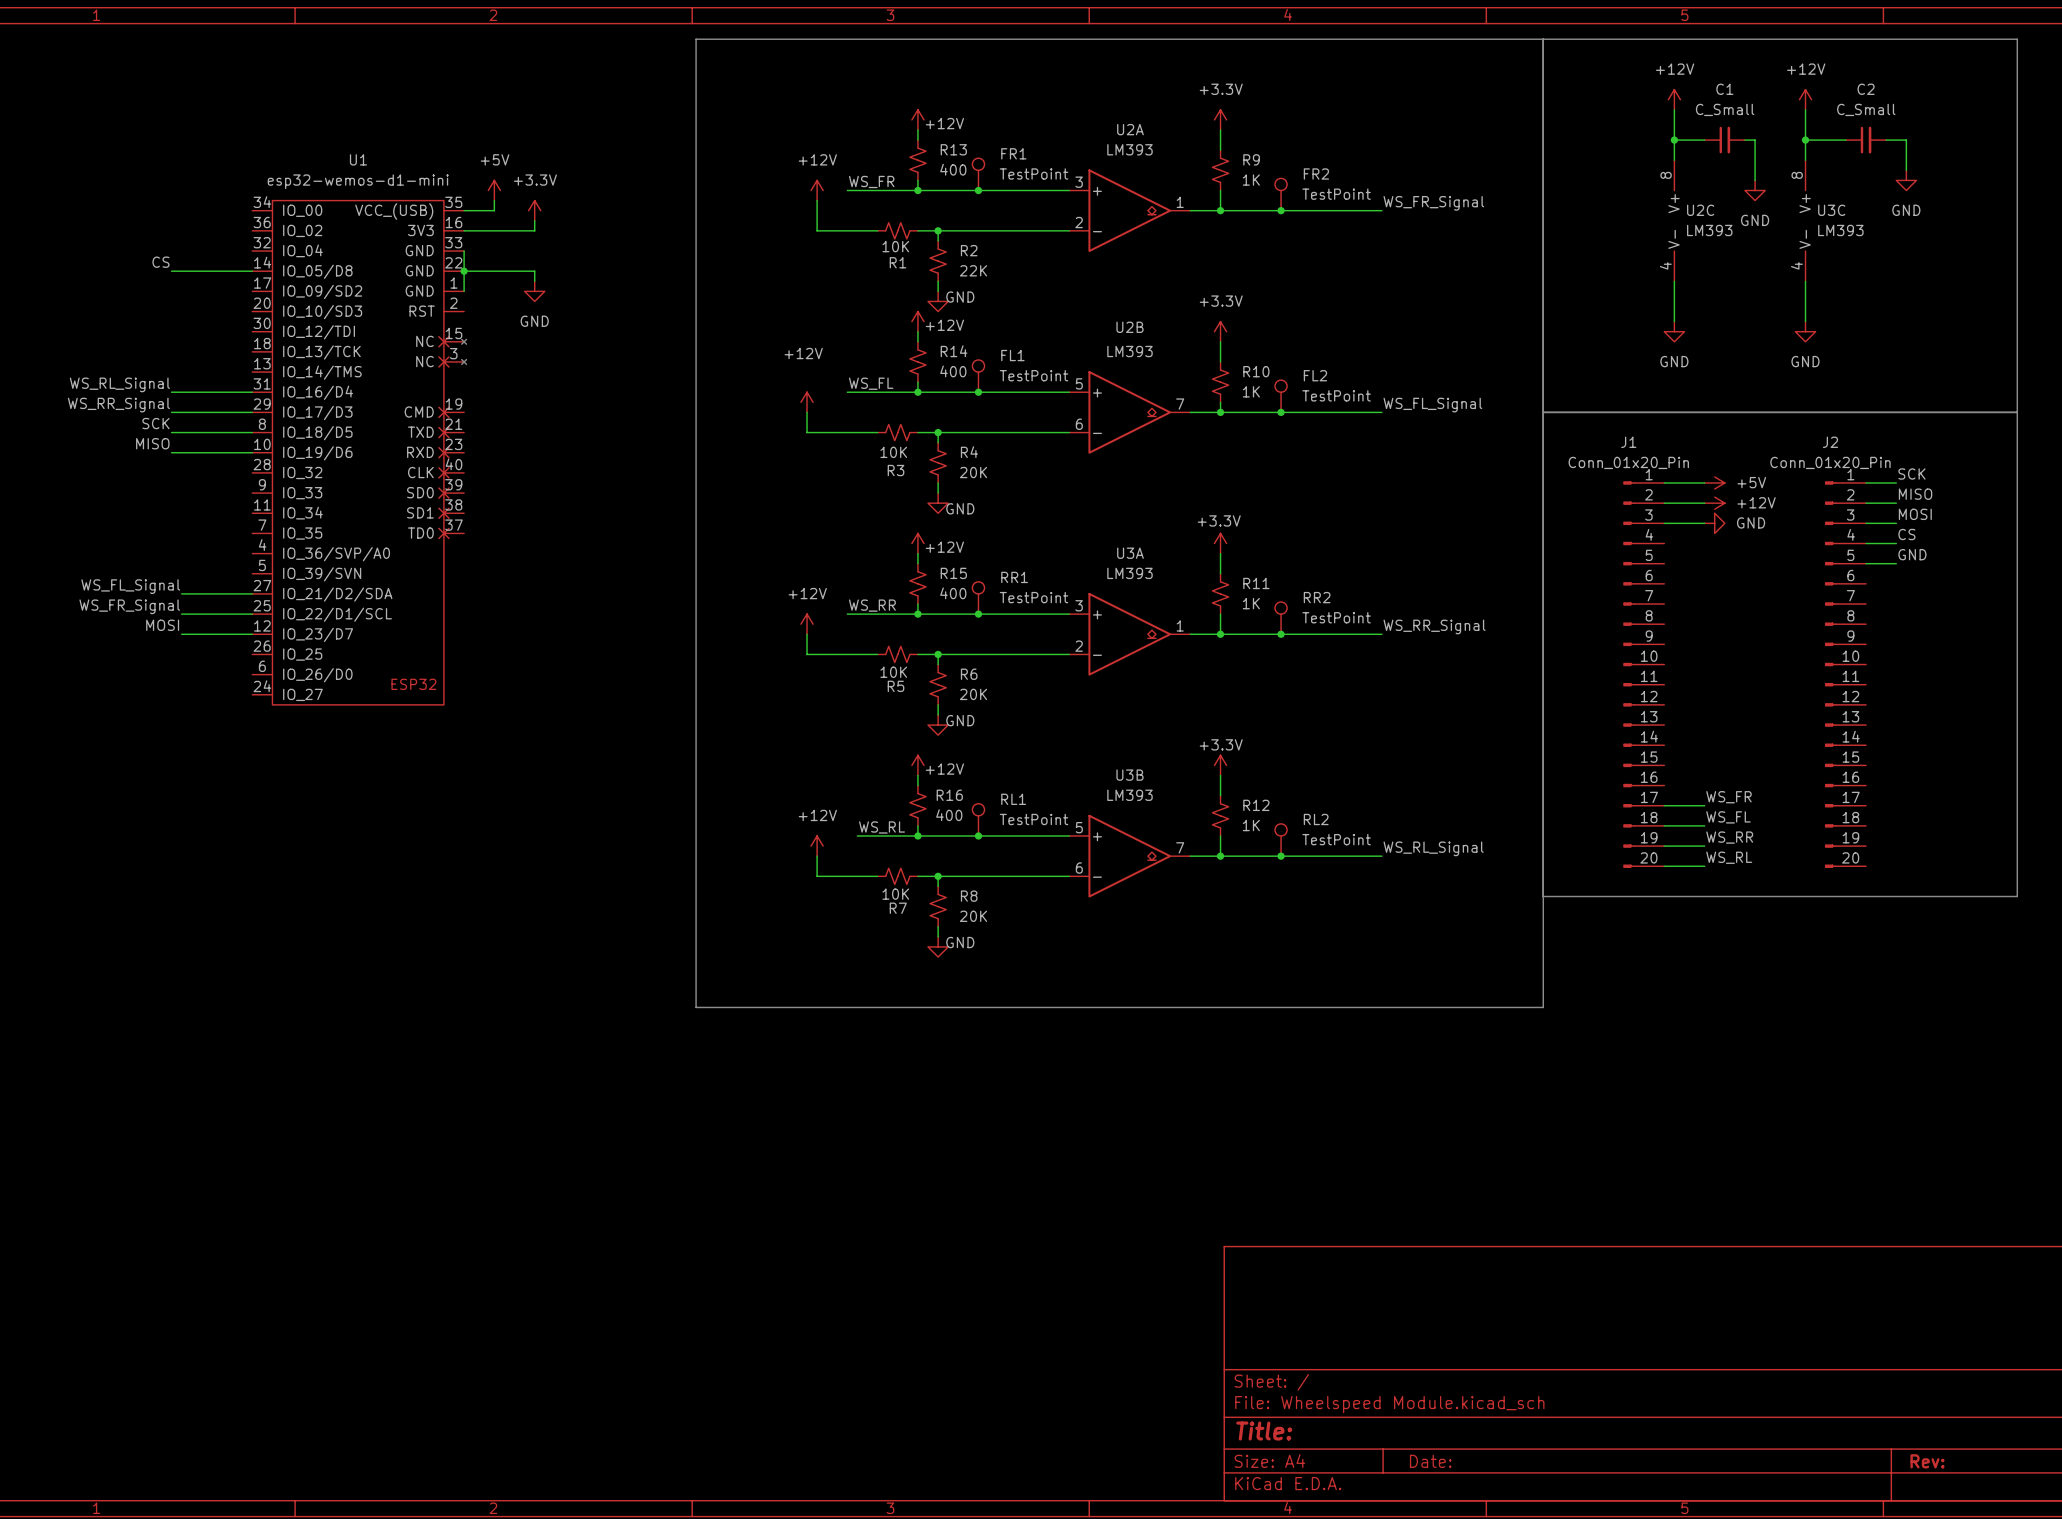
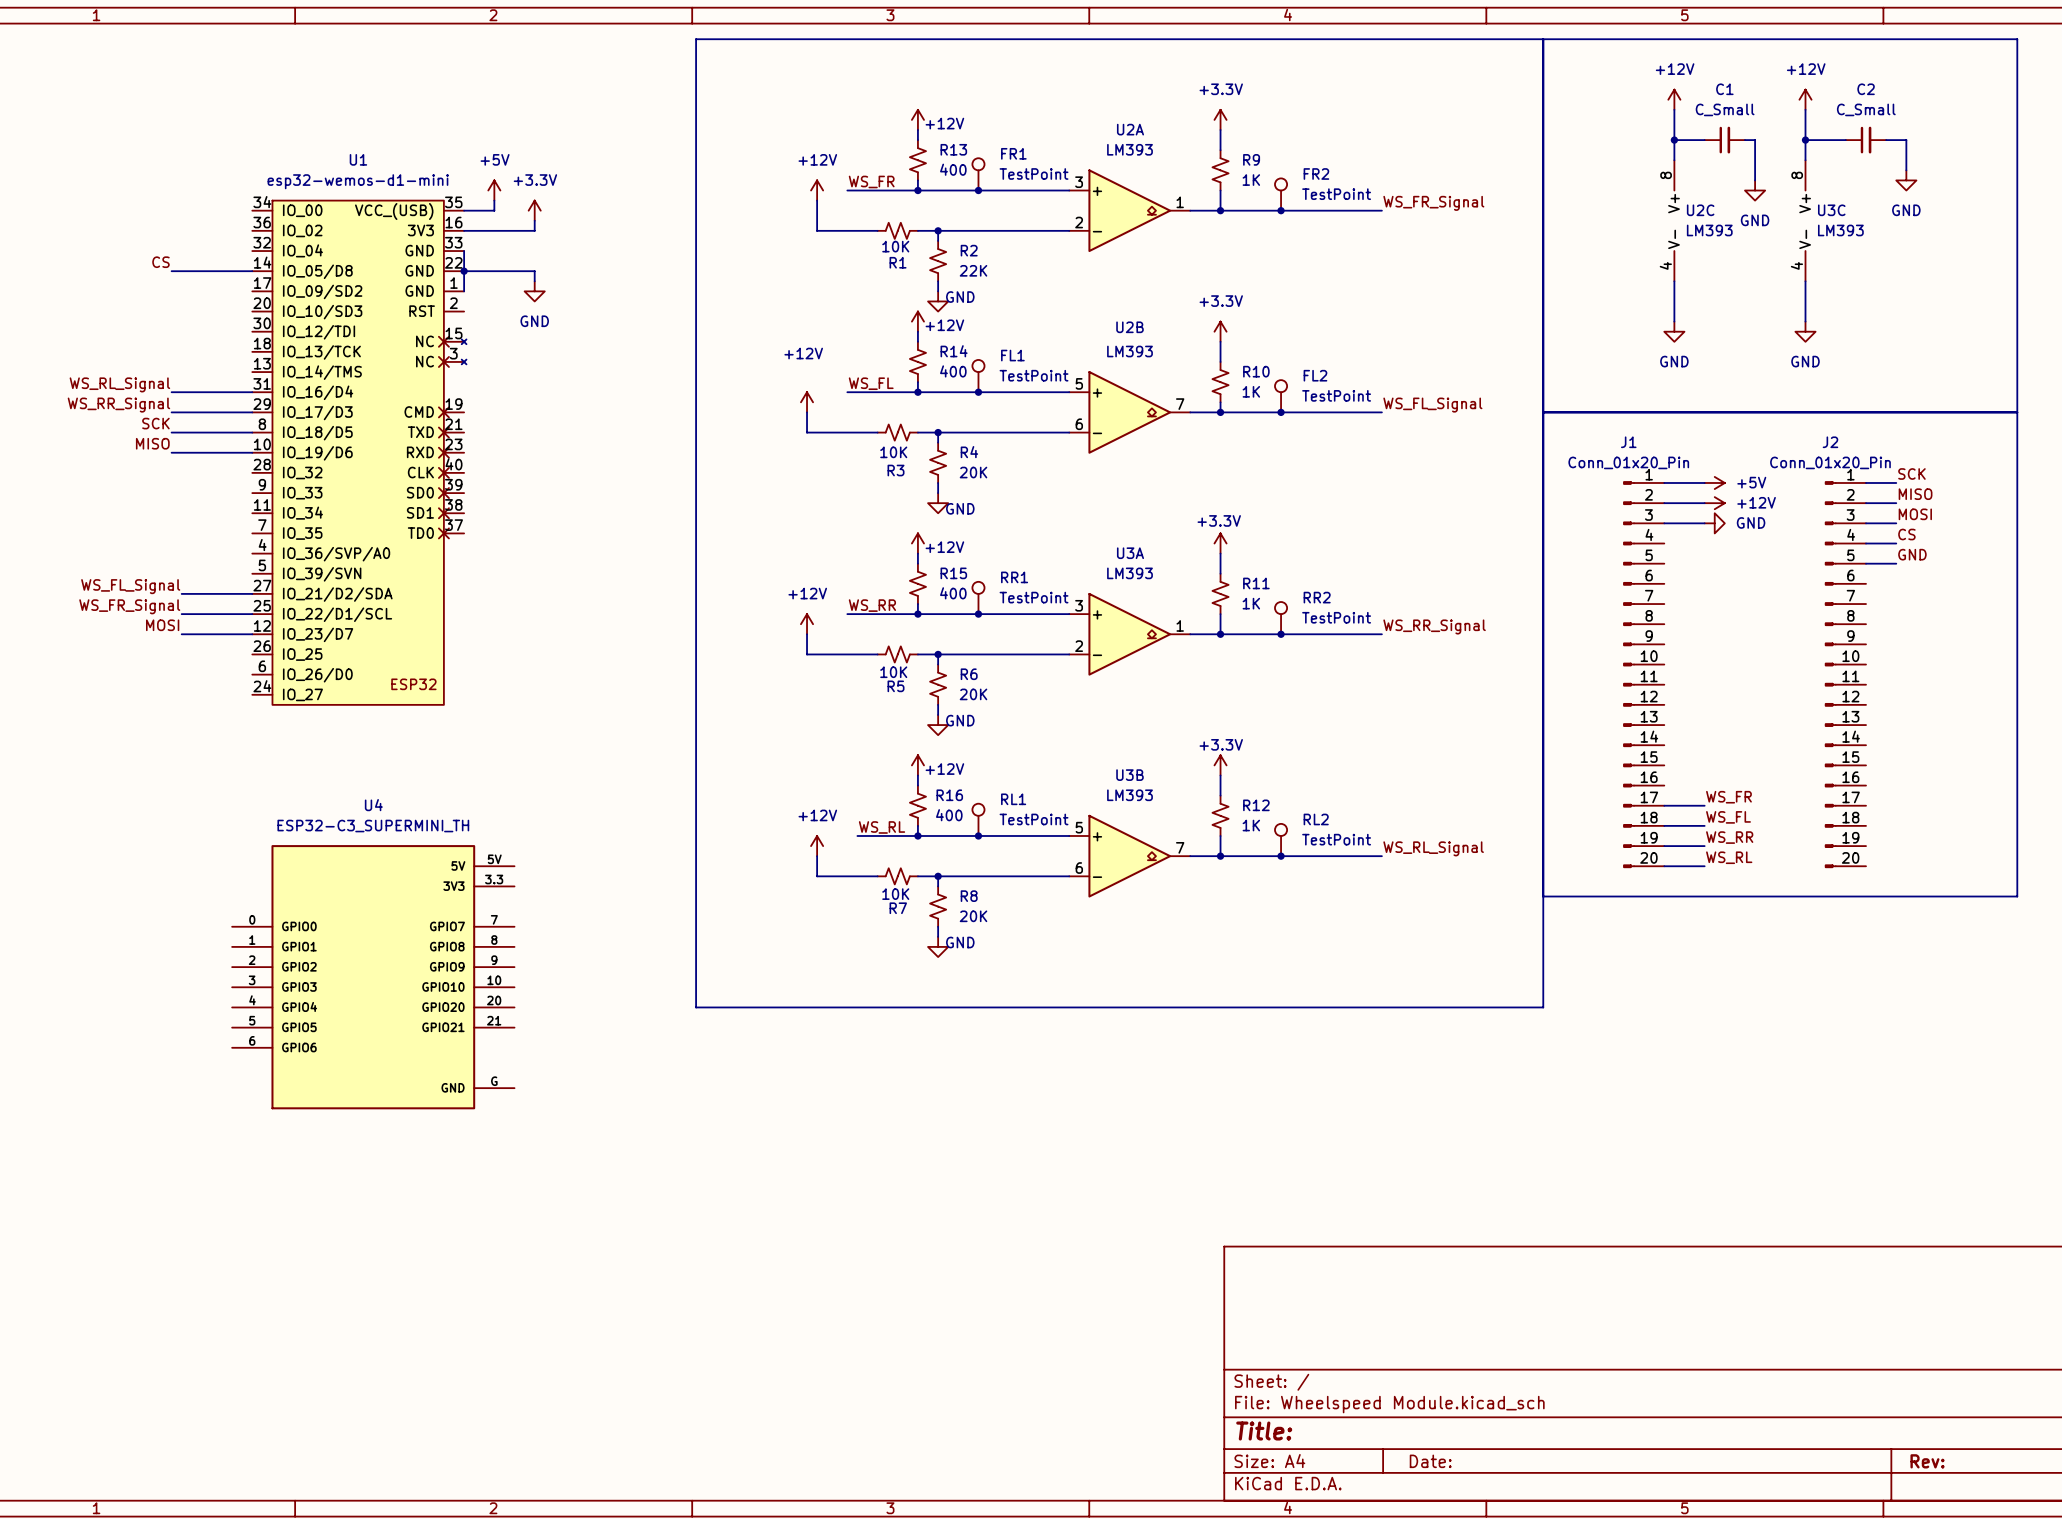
U4: none -> ESP32-C3_SUPERMINI_TH (373, 977)

